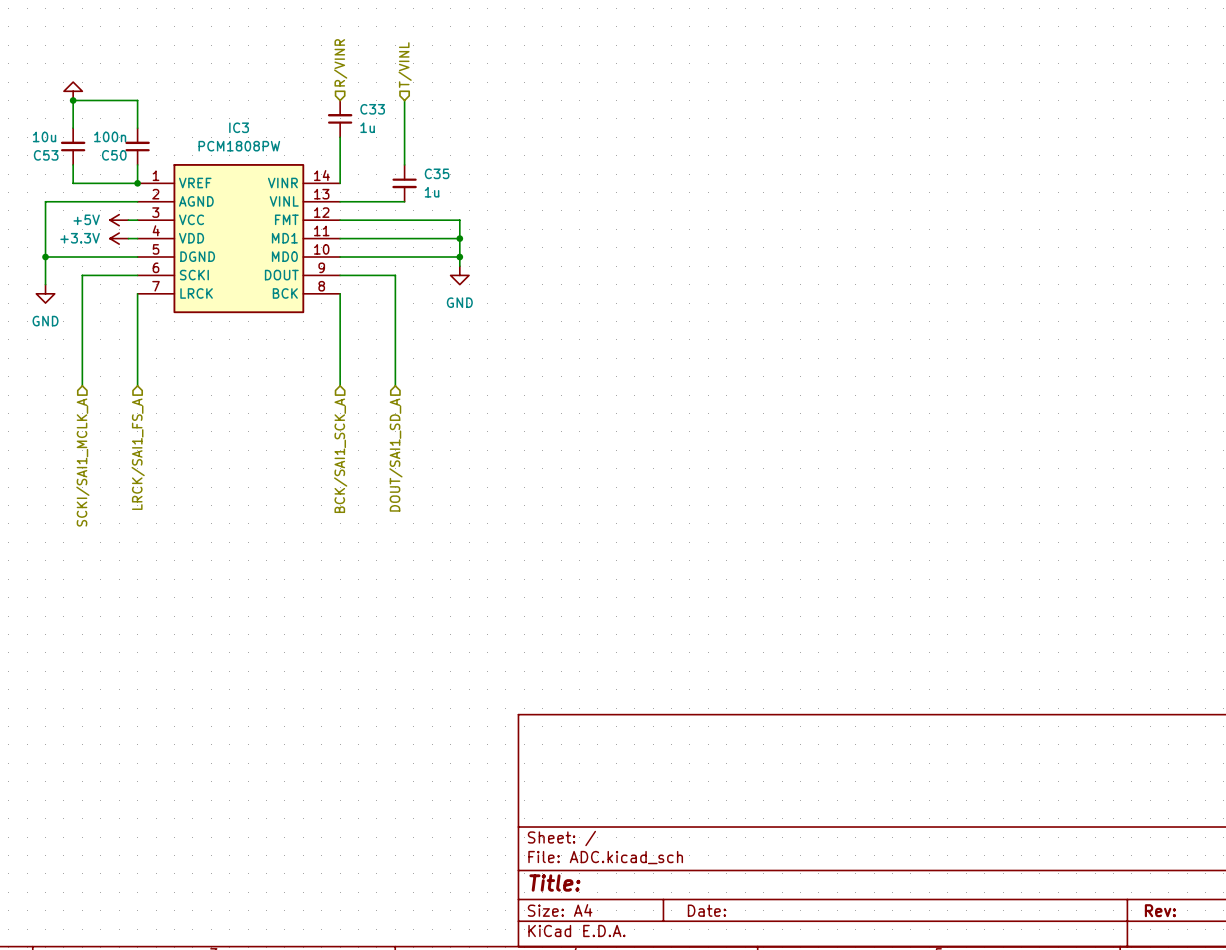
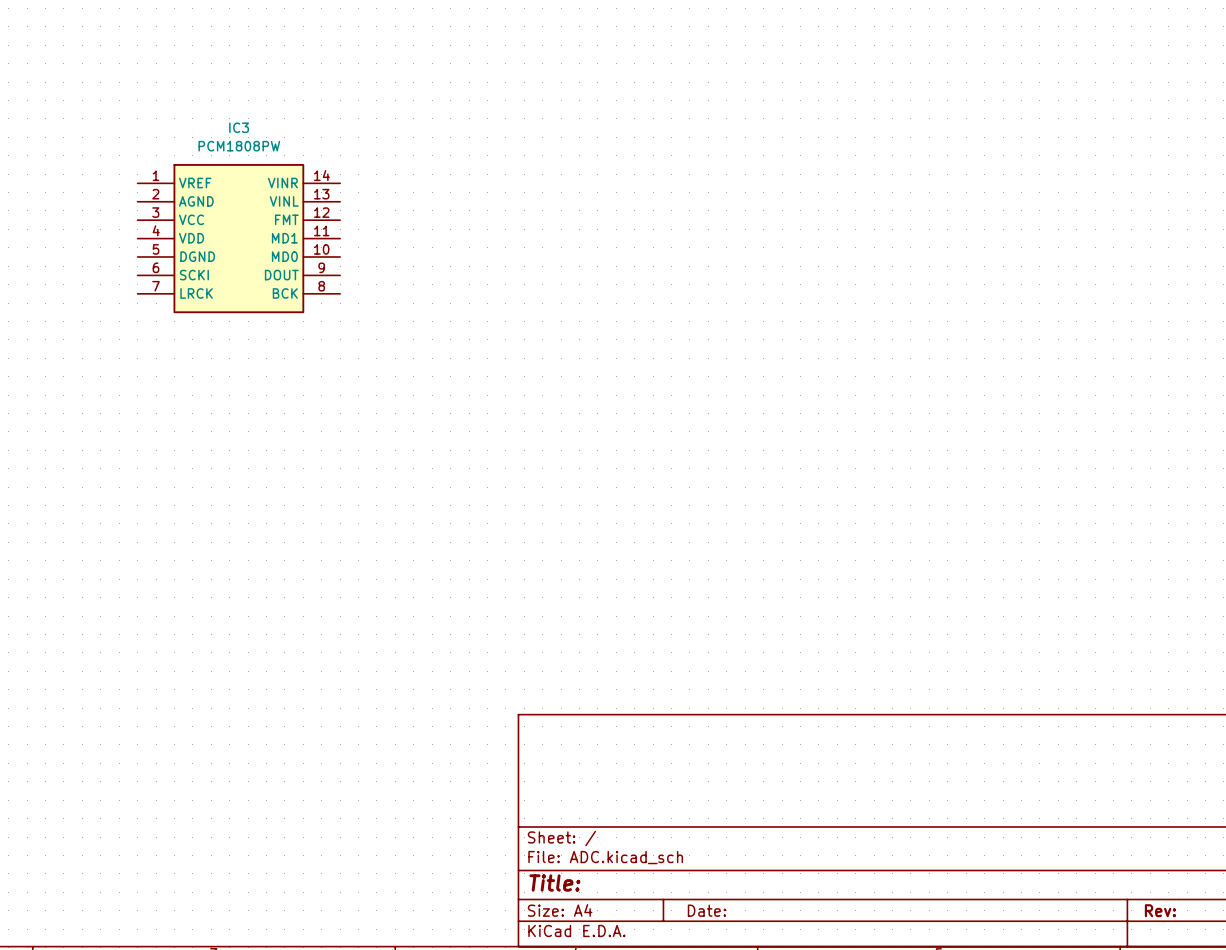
hierarchical label: R/VINR (340, 62) -> none
hierarchical label: T/VINL (405, 65) -> none
power symbol: (73, 91) -> none
junction: (73, 100) -> none
wire: (404, 100) (404, 164) -> none
C33: 1u (340, 118) -> none
wire: (73, 128) (73, 100) (137, 100) (137, 128) -> none
wire: (340, 137) (340, 183) -> none
C53: 10u (73, 146) -> none
C50: 100n (137, 146) -> none
wire: (73, 164) (73, 183) (137, 183) (137, 164) -> none
junction: (137, 183) -> none
C35: 1u (404, 183) -> none
wire: (137, 201) (45, 201) (45, 284) -> none
wire: (340, 201) (404, 201) -> none
power symbol: +5V (119, 220) -> none
wire: (128, 220) (137, 220) -> none
wire: (340, 220) (459, 220) (459, 266) -> none
power symbol: +3.3V (119, 238) -> none
wire: (128, 238) (137, 238) -> none
wire: (340, 238) (459, 238) -> none
junction: (459, 238) -> none
wire: (45, 257) (137, 257) -> none
junction: (45, 257) -> none
wire: (340, 257) (459, 257) -> none
junction: (459, 257) -> none
wire: (137, 275) (82, 275) (82, 385) -> none
wire: (340, 275) (395, 275) (395, 385) -> none
power symbol: GND (459, 275) -> none
power symbol: GND (45, 293) -> none
wire: (137, 293) (137, 385) -> none
wire: (340, 293) (340, 385) -> none
hierarchical label: LRCK/SAI1_FS_A (138, 454) -> none
hierarchical label: BCK/SAI1_SCK_A (340, 455) -> none
hierarchical label: DOUT/SAI1_SD_A (395, 455) -> none
hierarchical label: SCKI/SAI1_MCLK_A (82, 462) -> none

